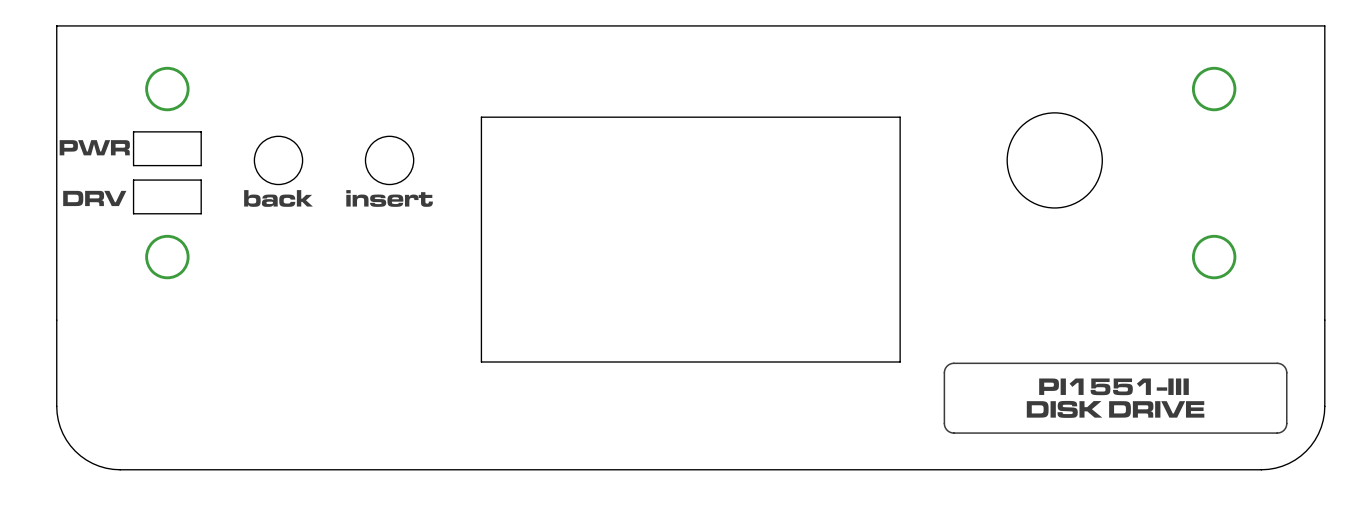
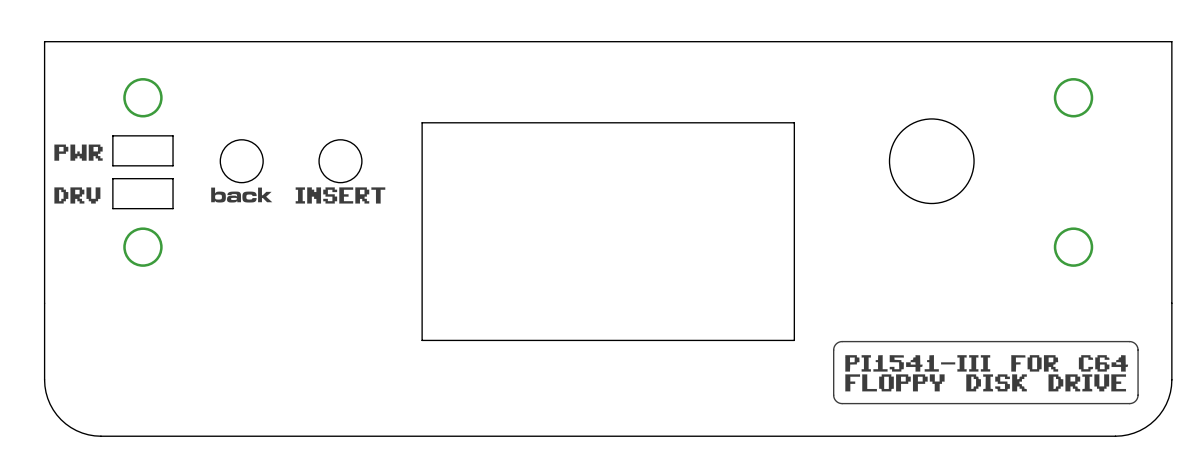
drawing shape: [59, 140, 130, 156] -> [54, 144, 103, 161]
drawing shape: [63, 190, 127, 207] -> [54, 187, 101, 204]
drawing shape: [346, 190, 433, 207] -> [295, 187, 386, 204]
drawing shape: [1026, 378, 1205, 418] -> [845, 355, 1129, 392]

